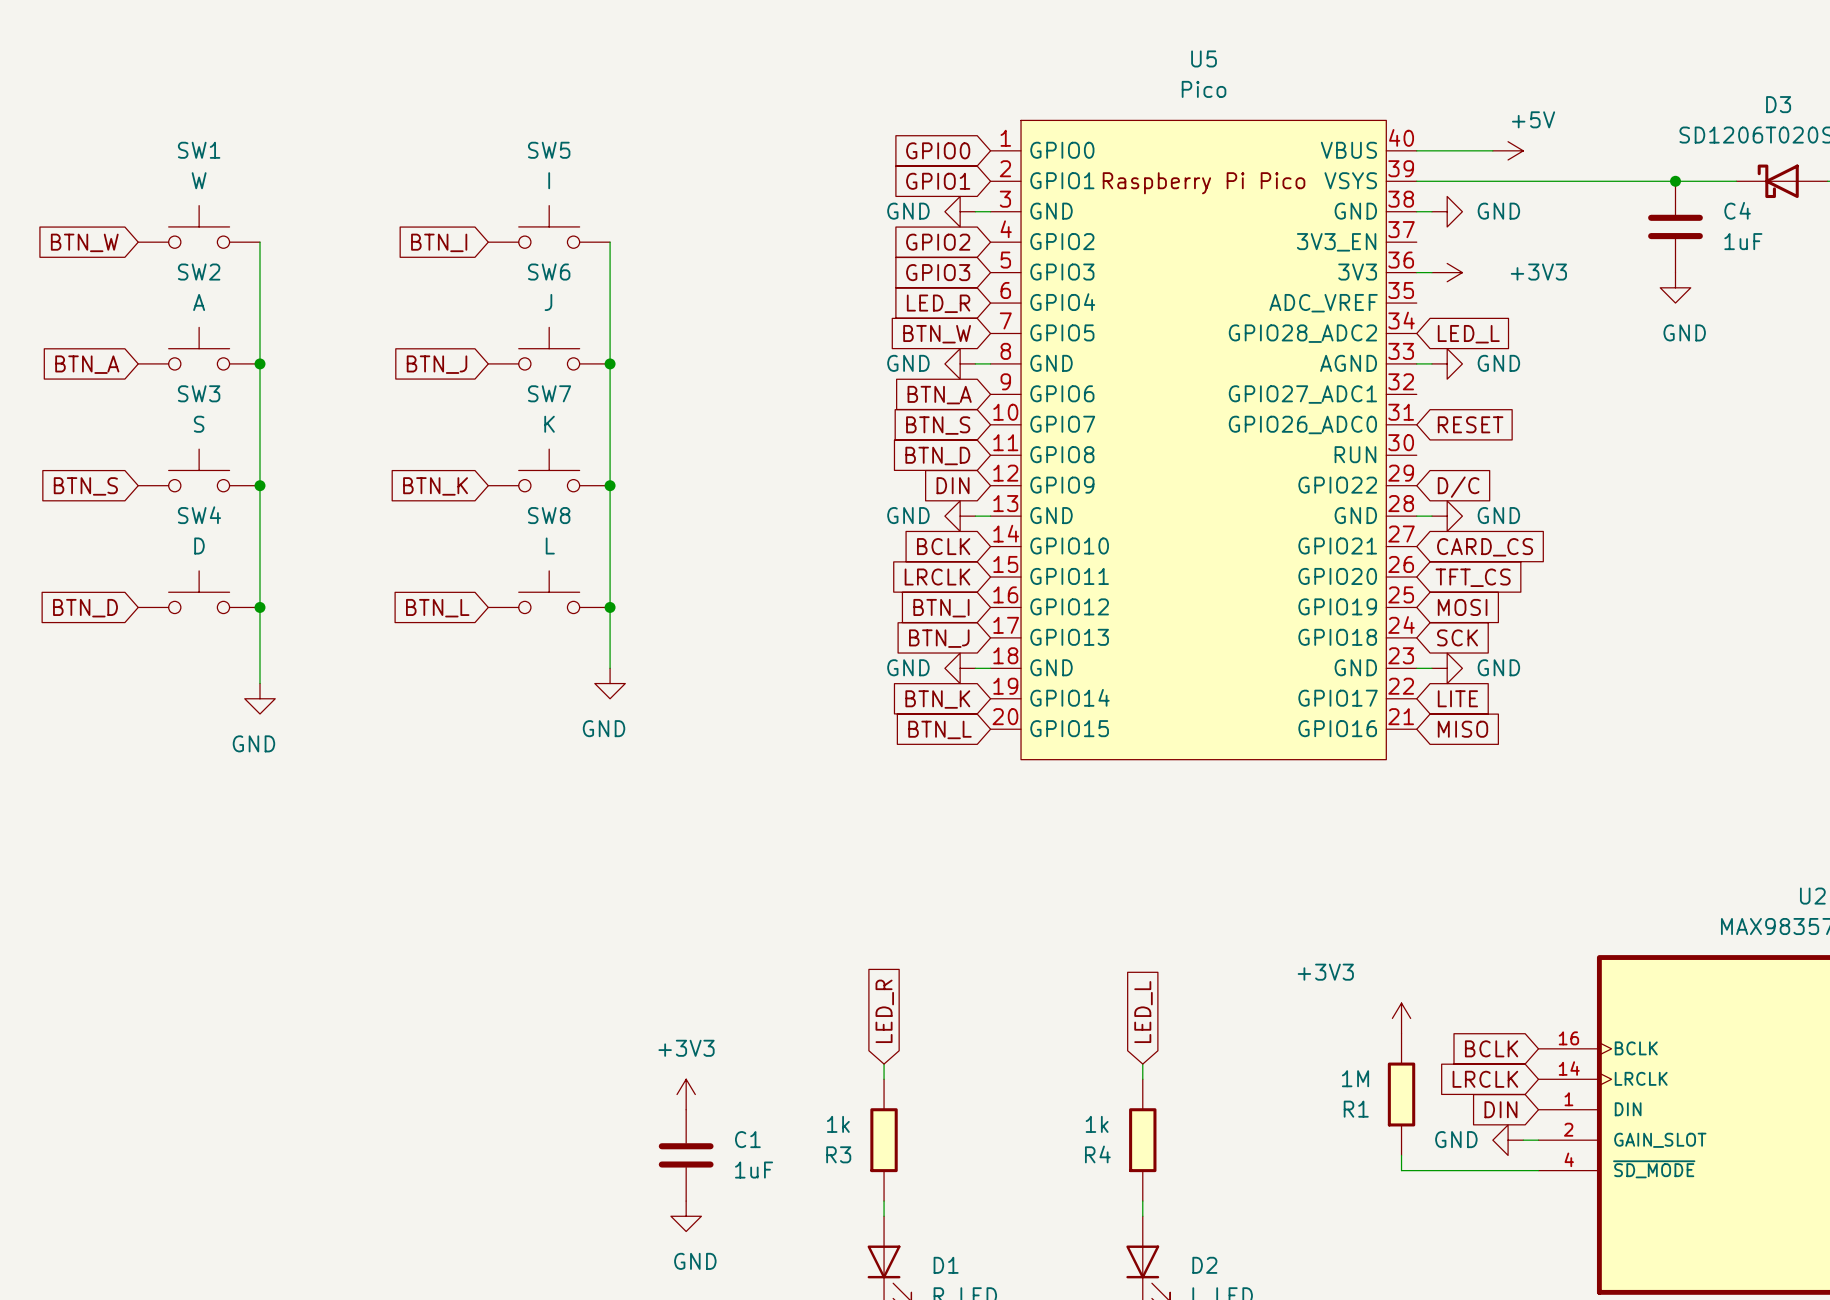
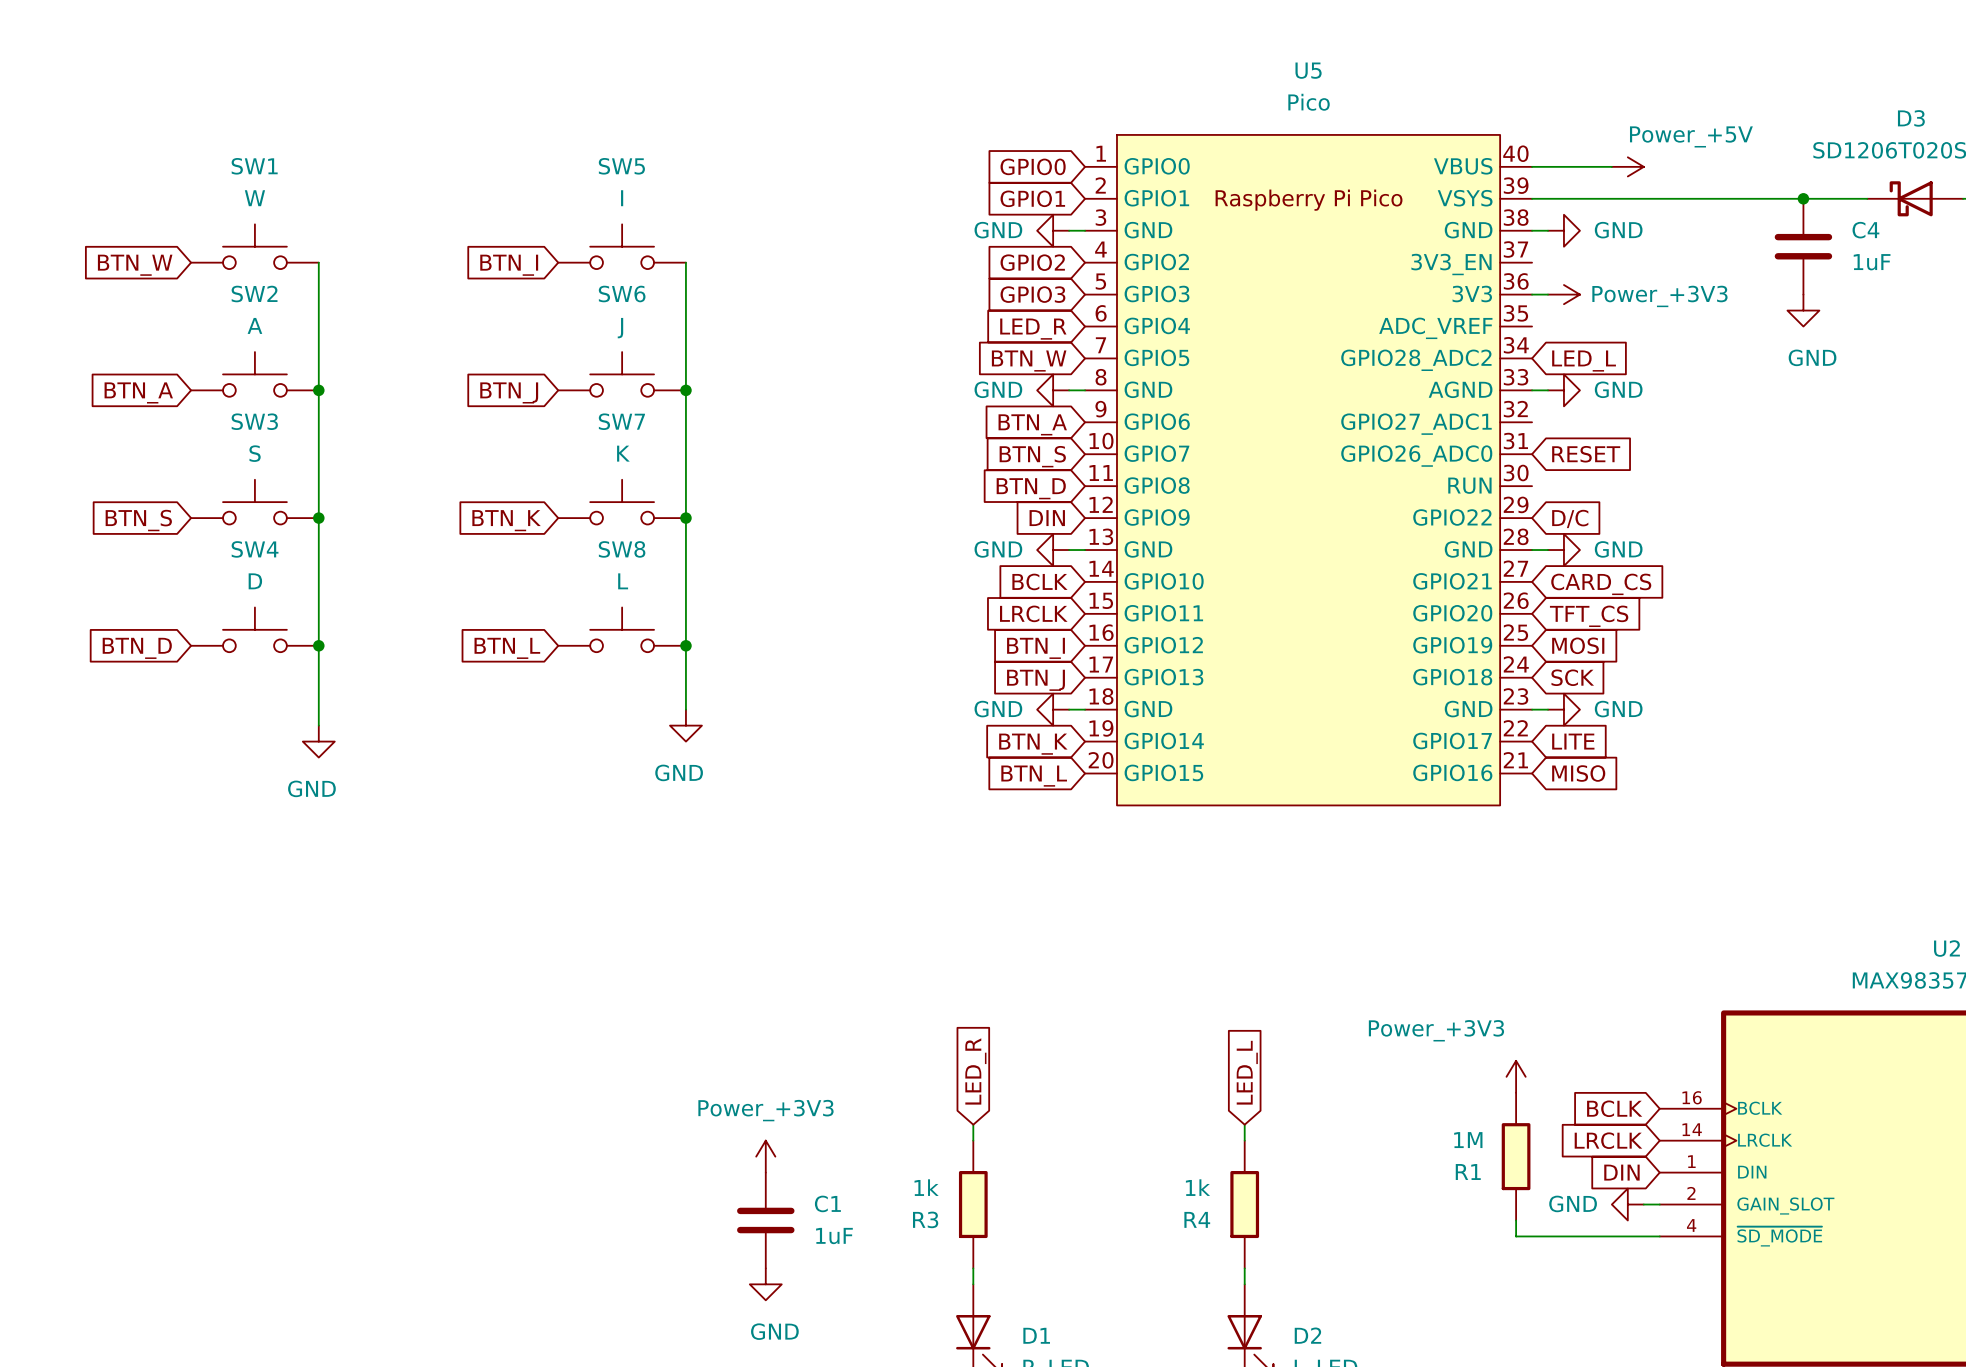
power symbol: +5V (1508, 150) -> Power_+5V (1627, 166)
power symbol: +3V3 (1447, 272) -> Power_+3V3 (1563, 294)
power symbol: +3V3 (1401, 1018) -> Power_+3V3 (1516, 1076)
power symbol: +3V3 (686, 1094) -> Power_+3V3 (765, 1156)

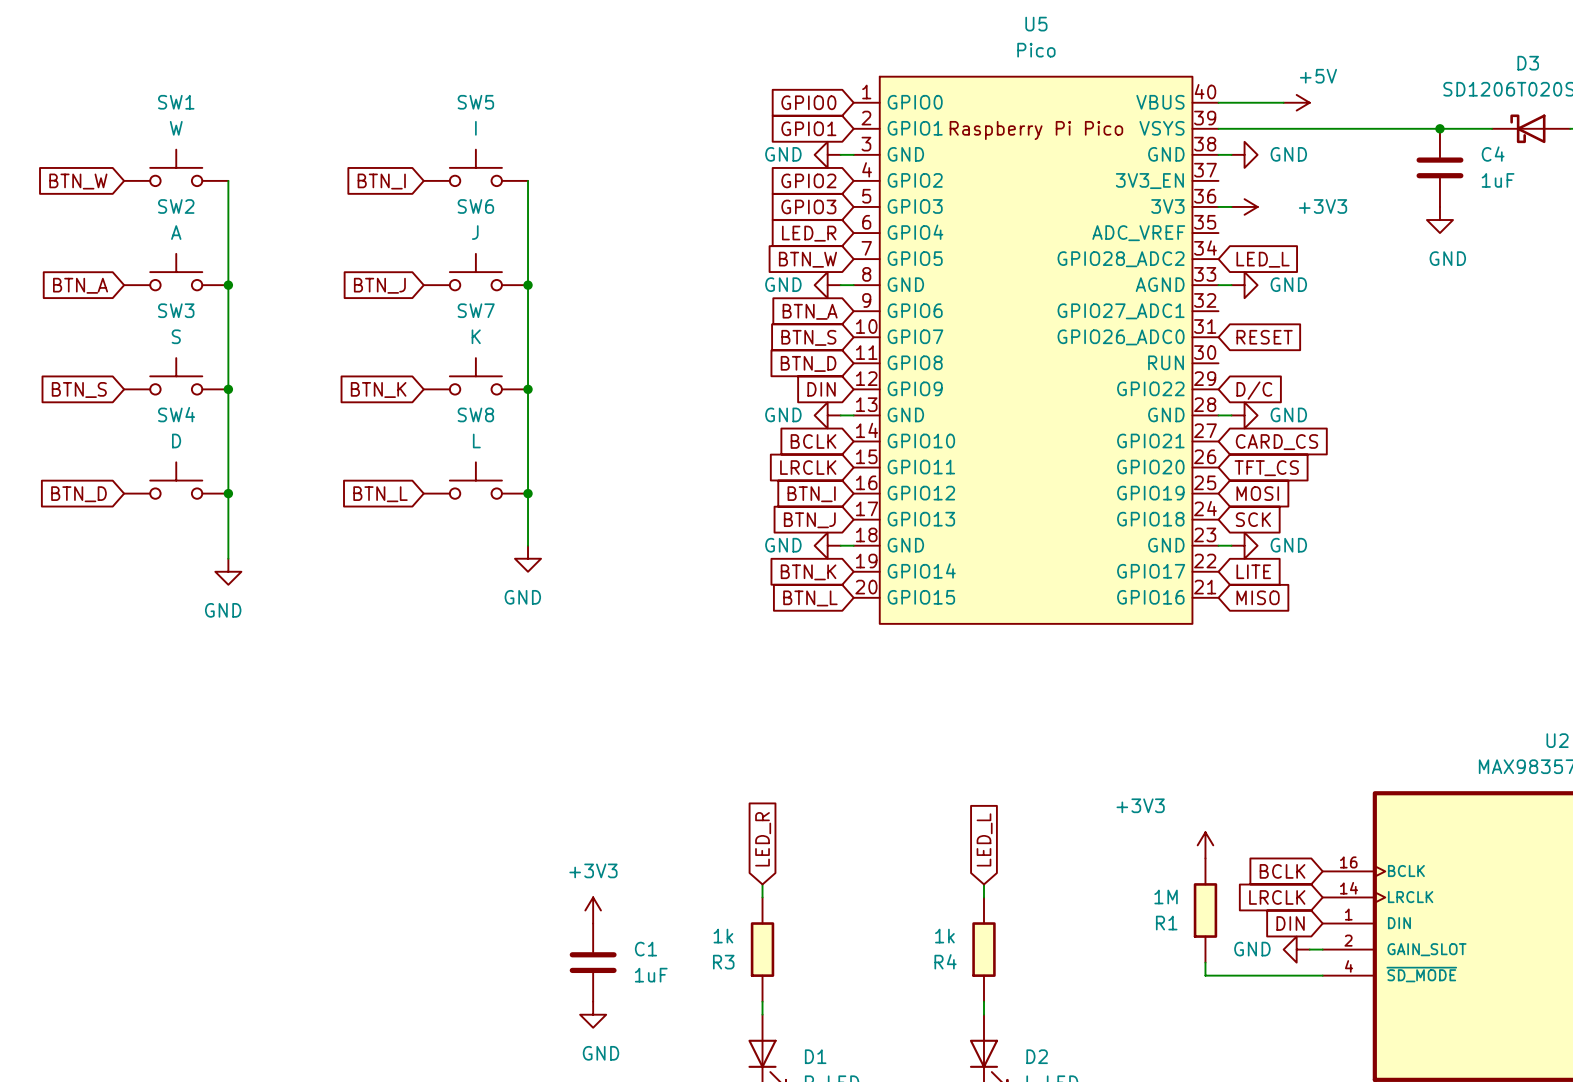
power symbol: Power_+5V (1627, 166) -> +5V (1296, 102)
power symbol: Power_+3V3 (1563, 294) -> +3V3 (1244, 206)
power symbol: Power_+3V3 (1516, 1076) -> +3V3 (1205, 845)
power symbol: Power_+3V3 (765, 1156) -> +3V3 (593, 910)

